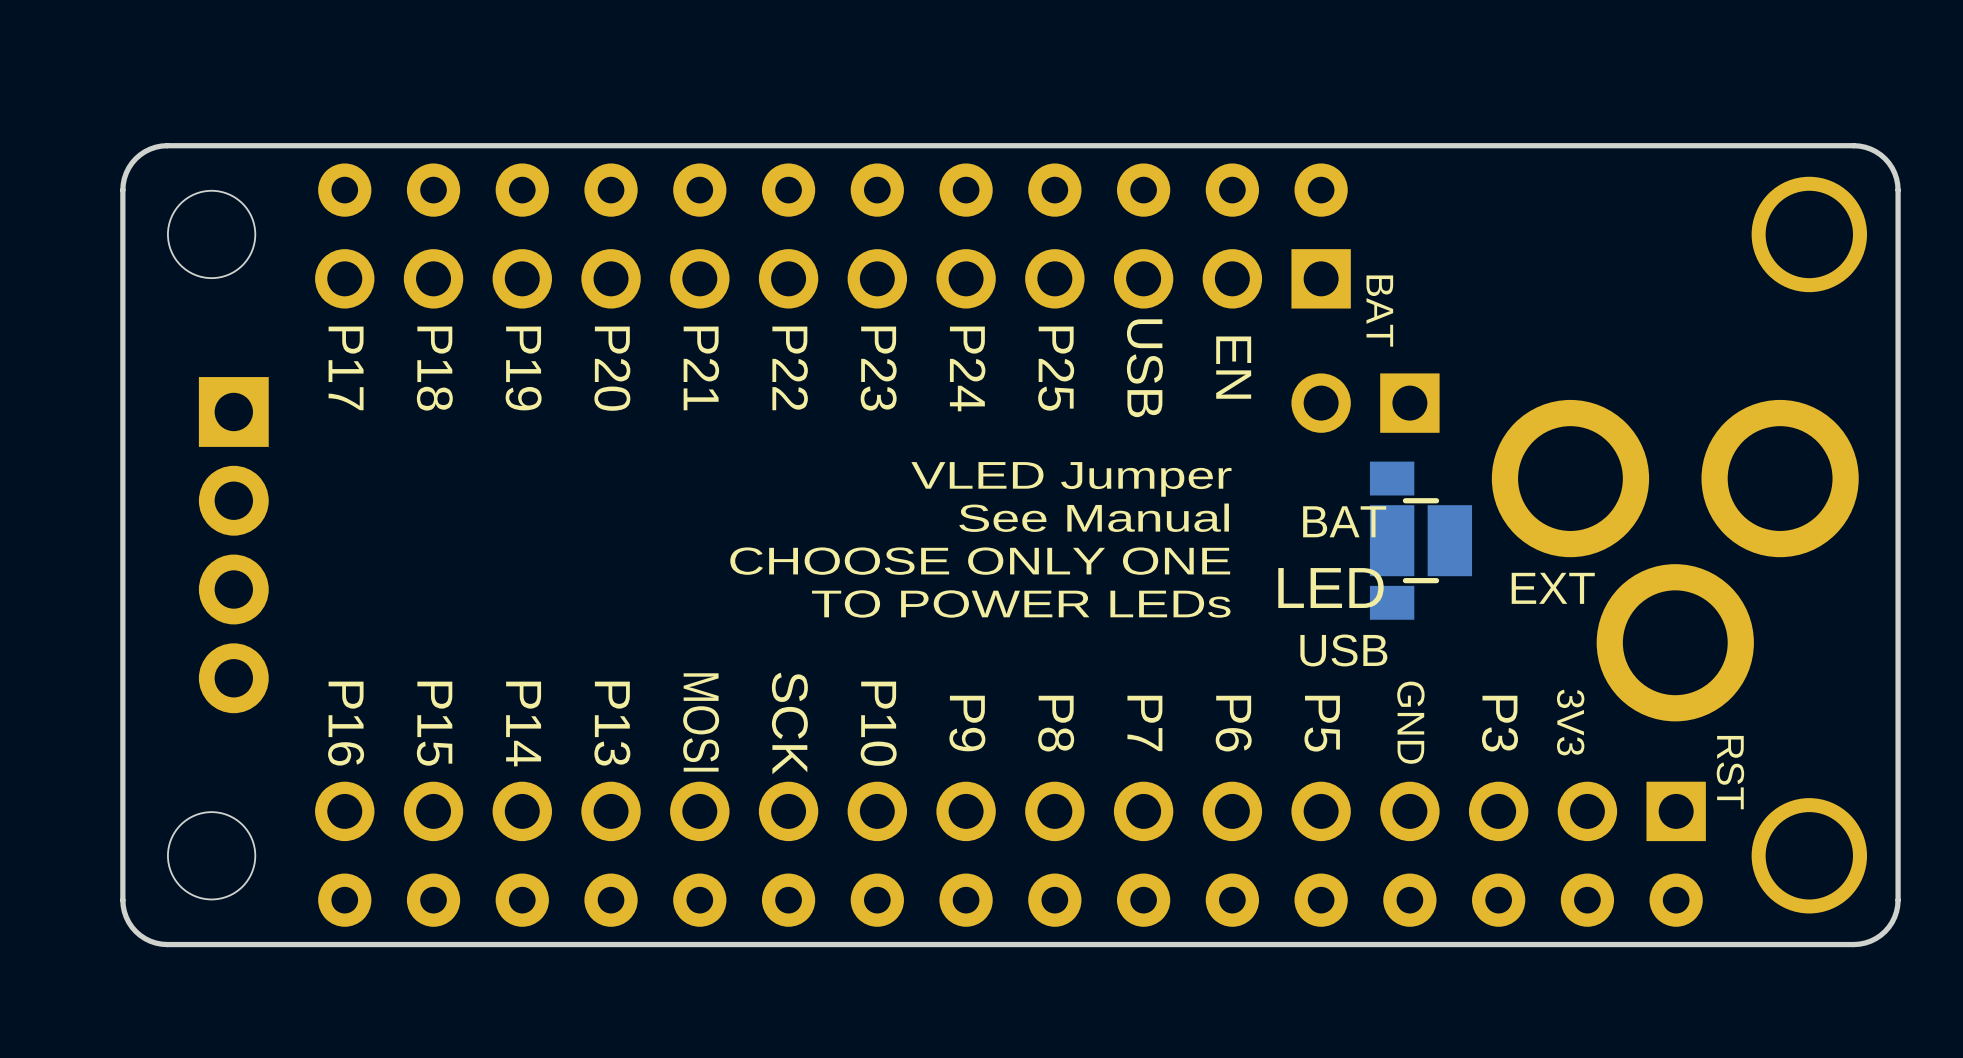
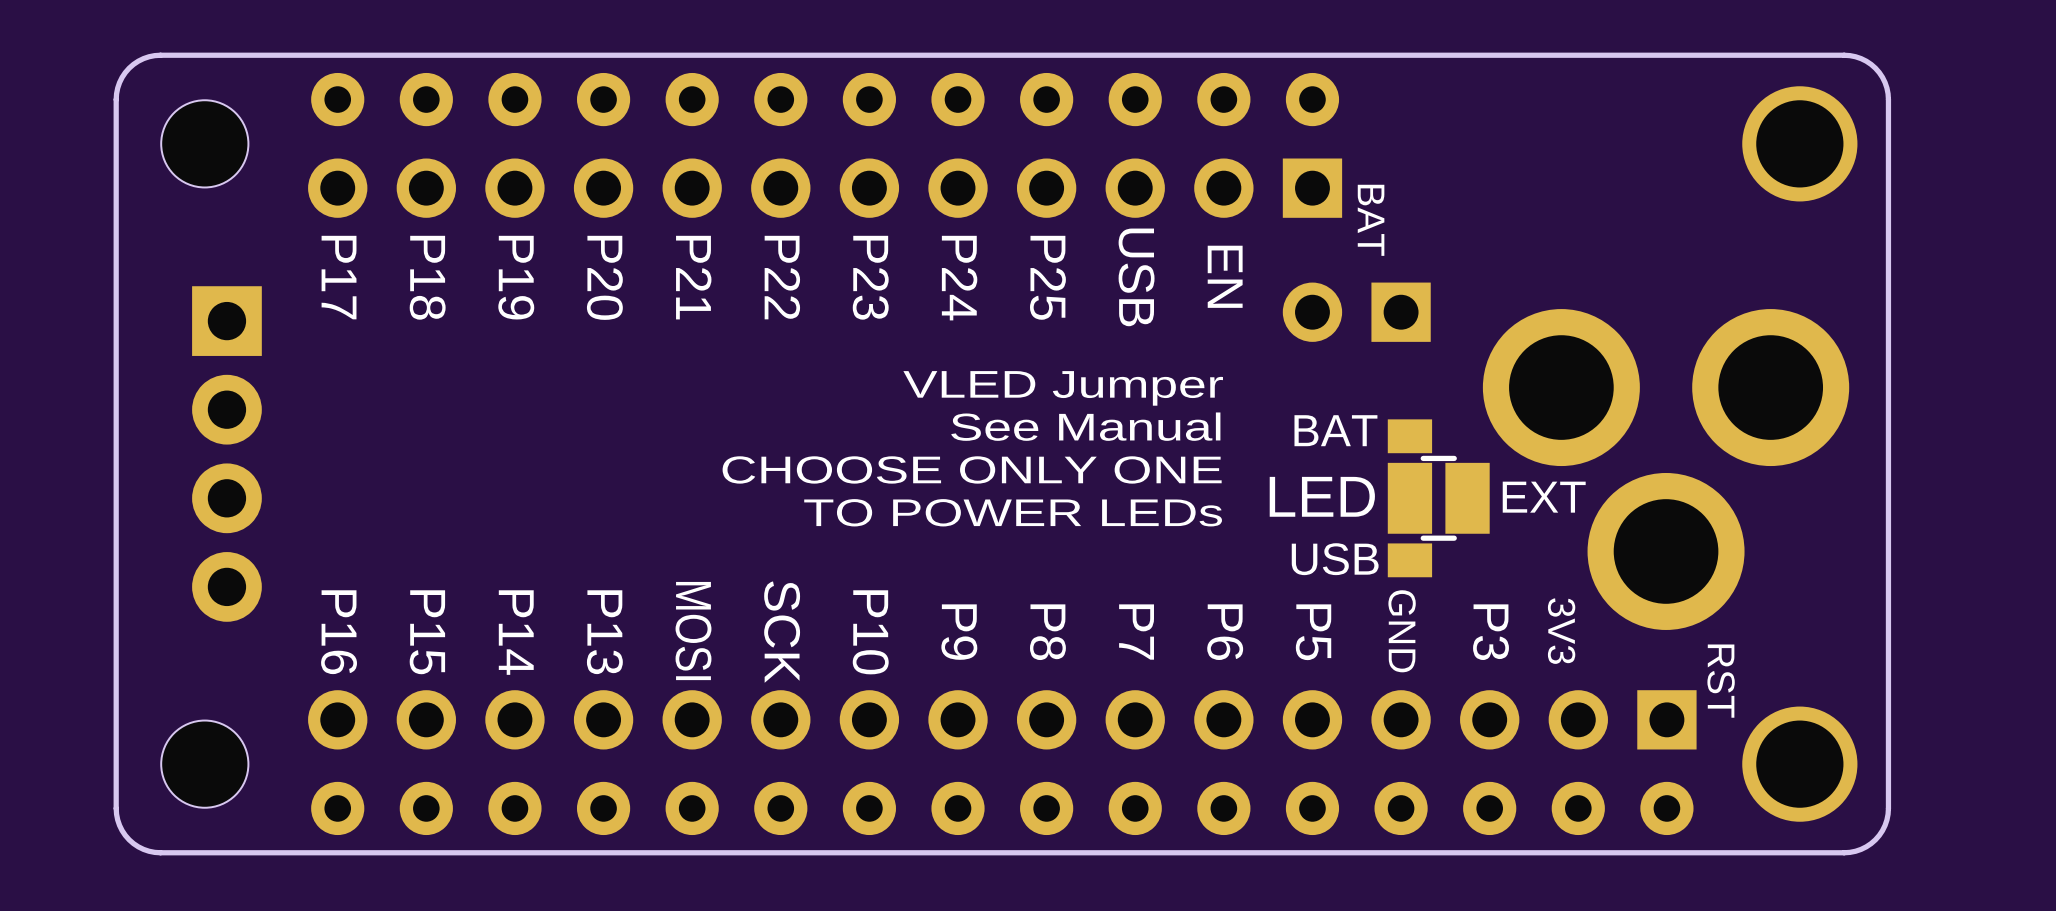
part position: (1420, 540) -> (1438, 498)

